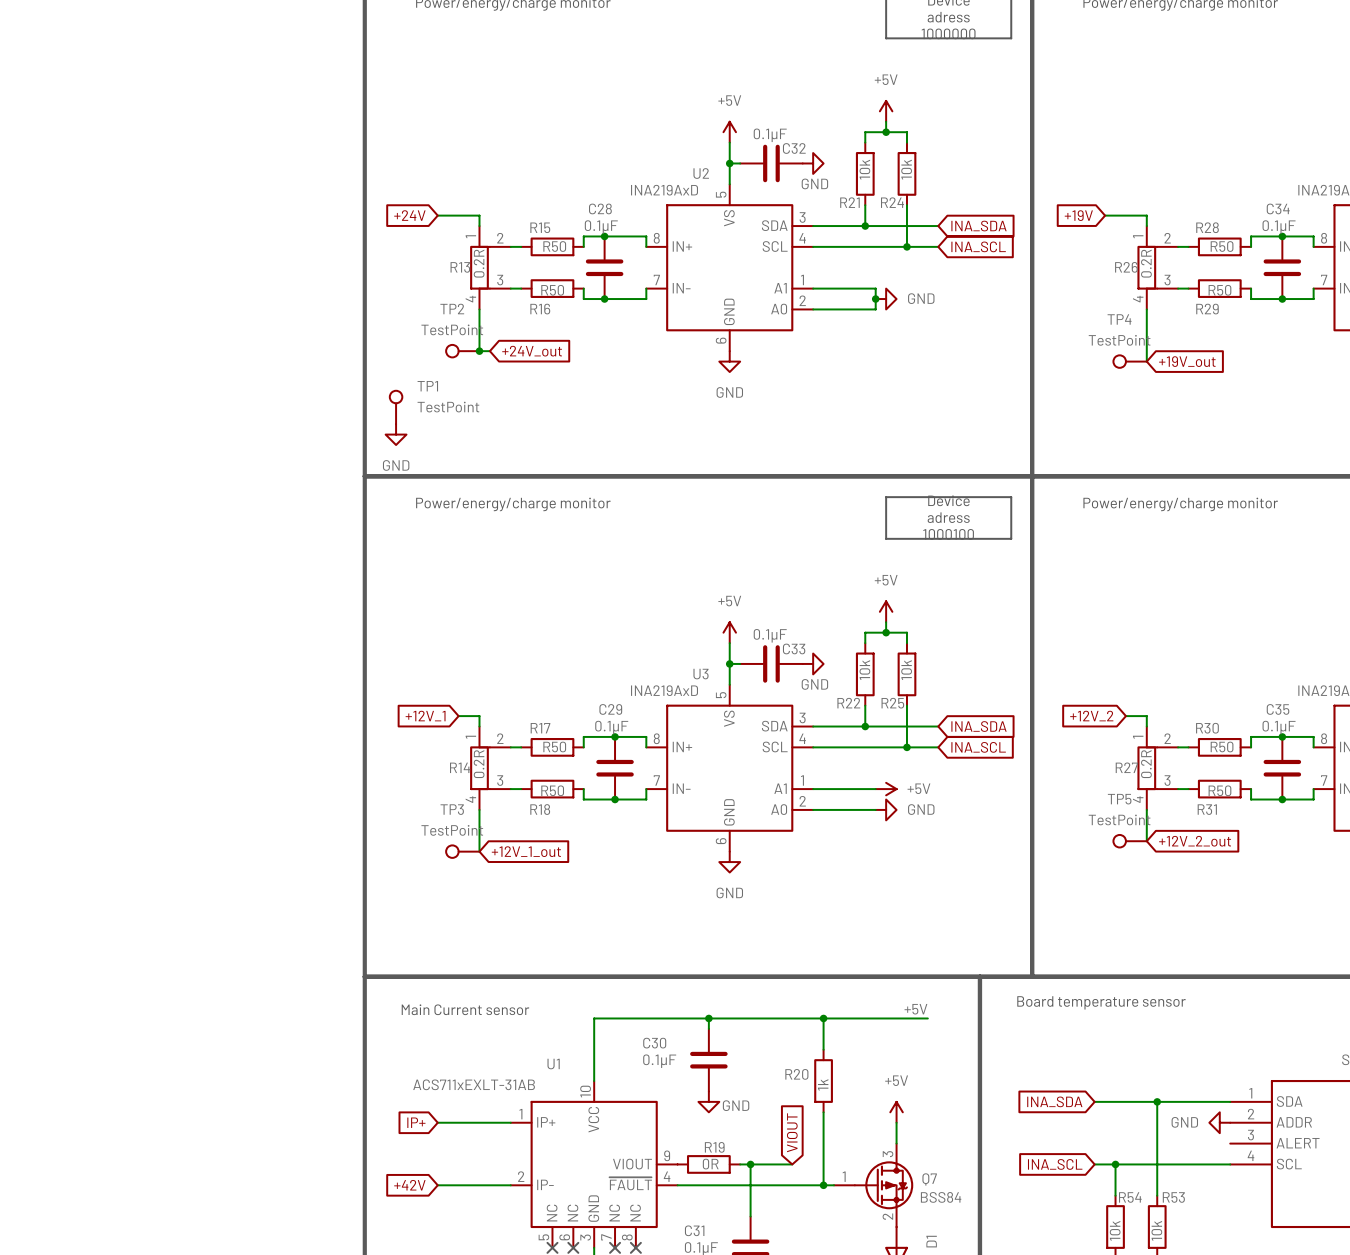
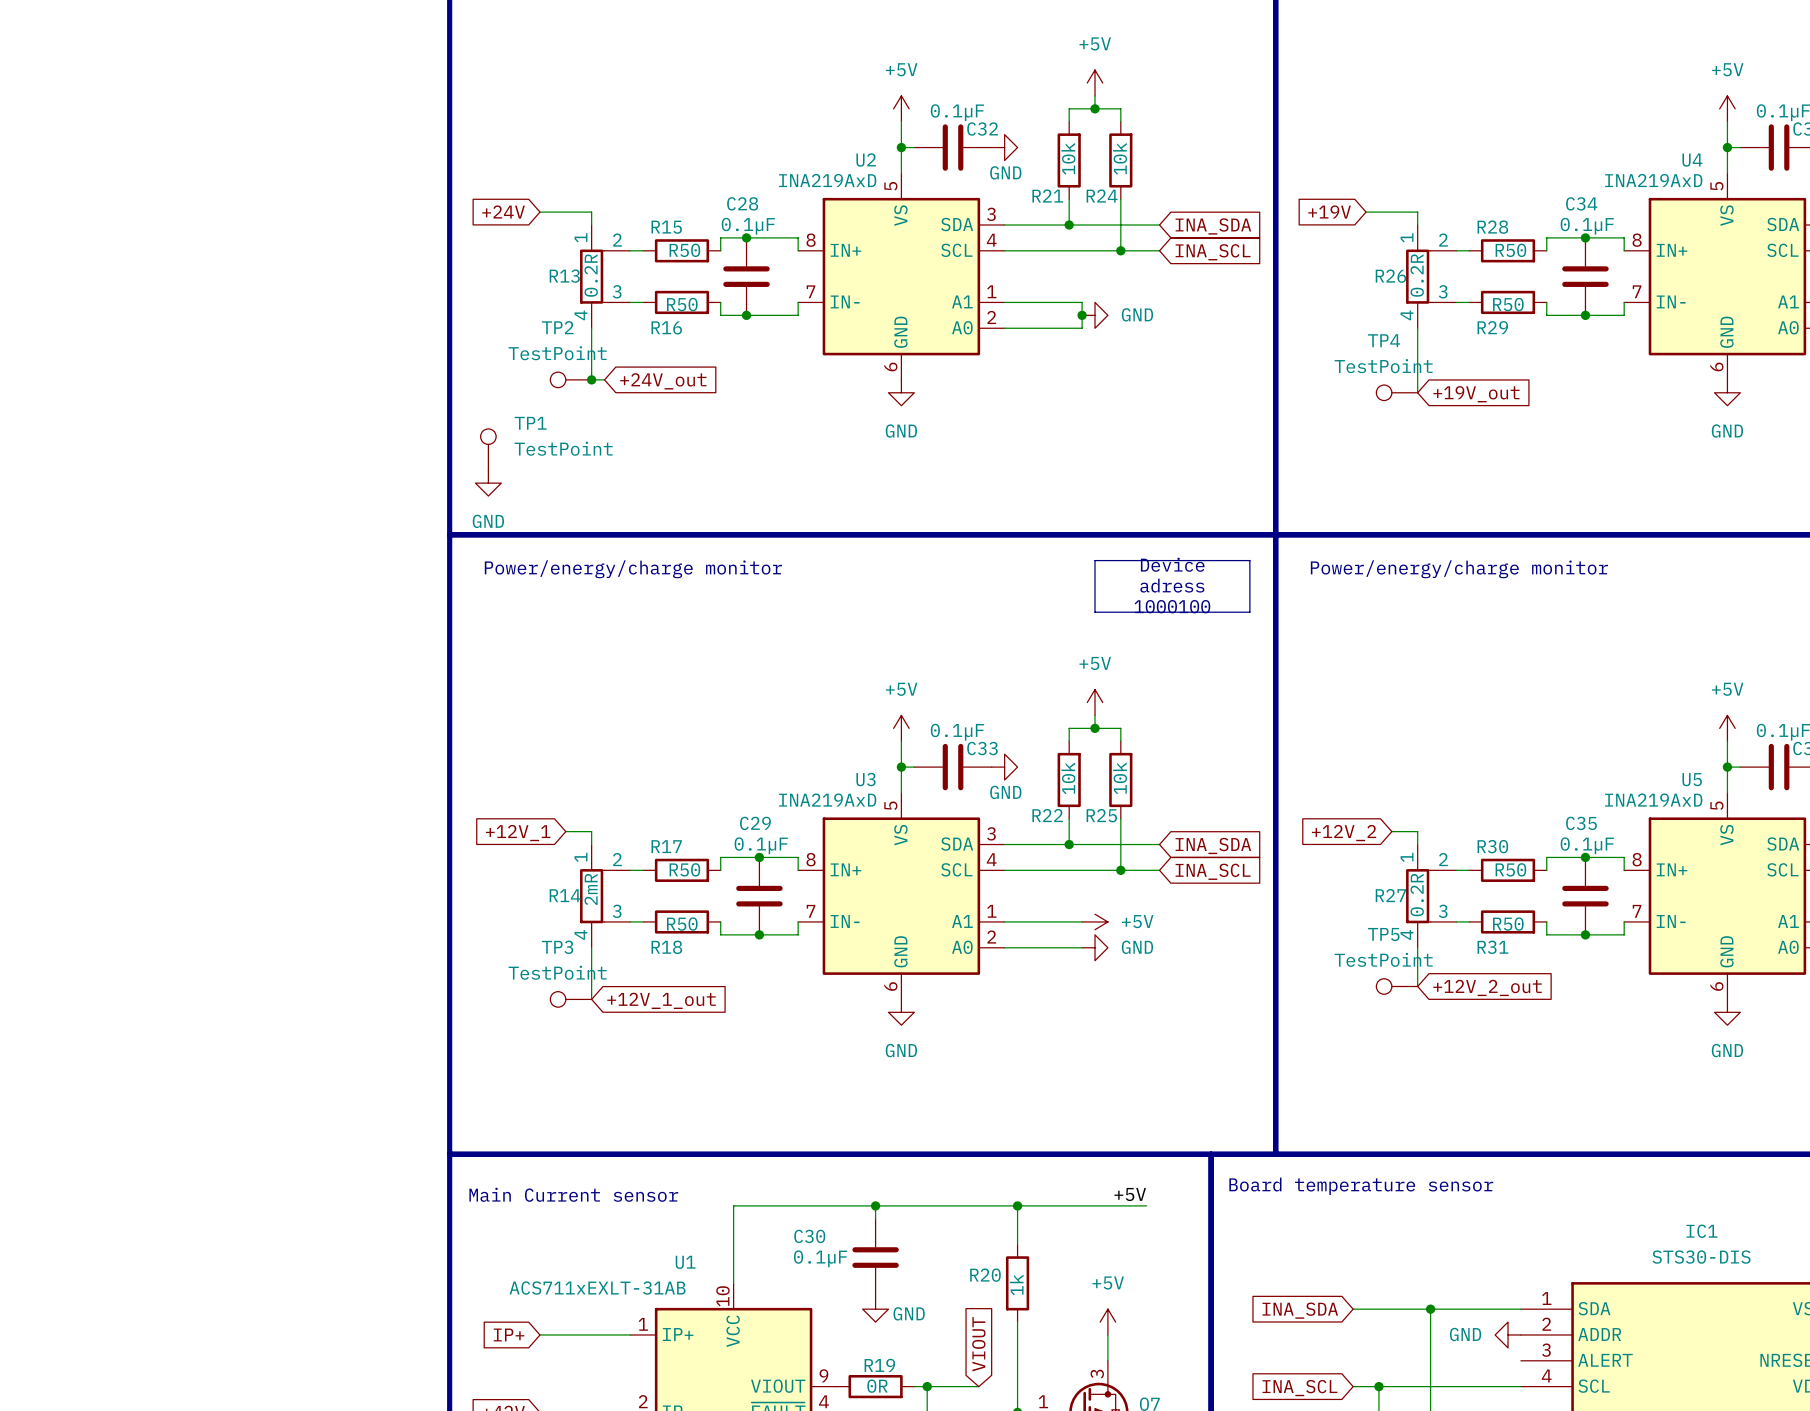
R14 value: 0.2R (479, 764) -> 2mR (591, 889)

